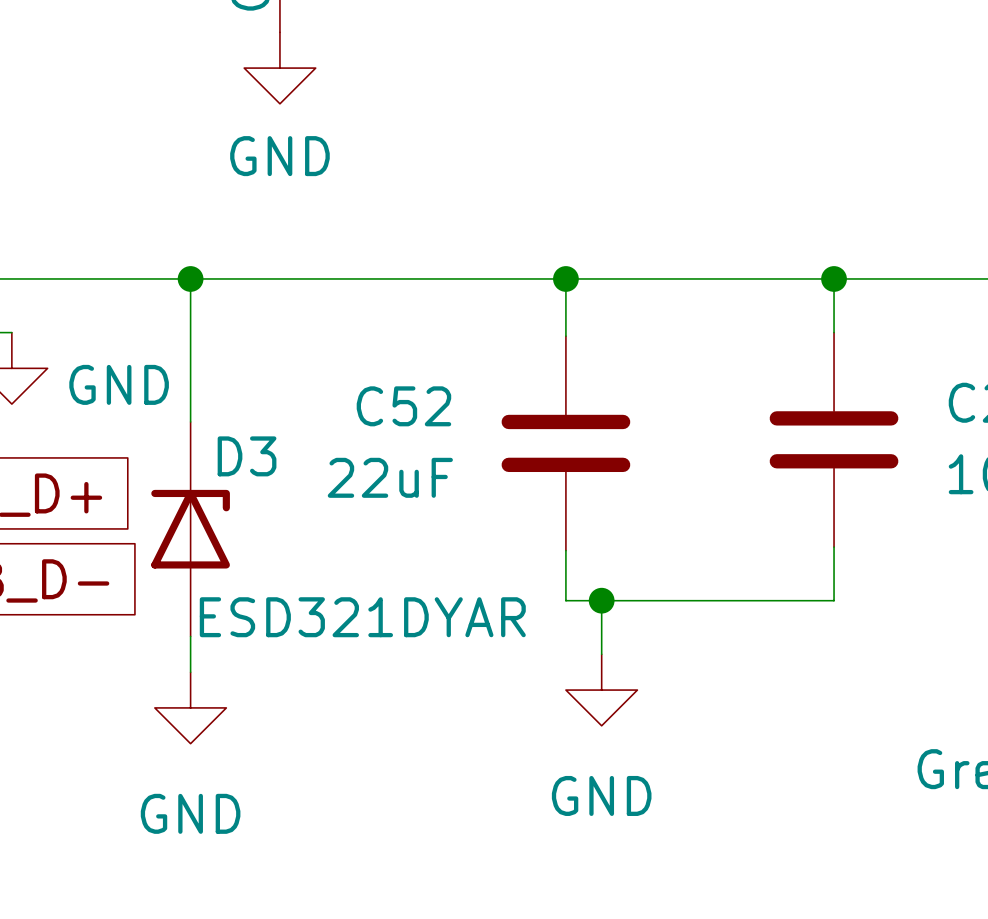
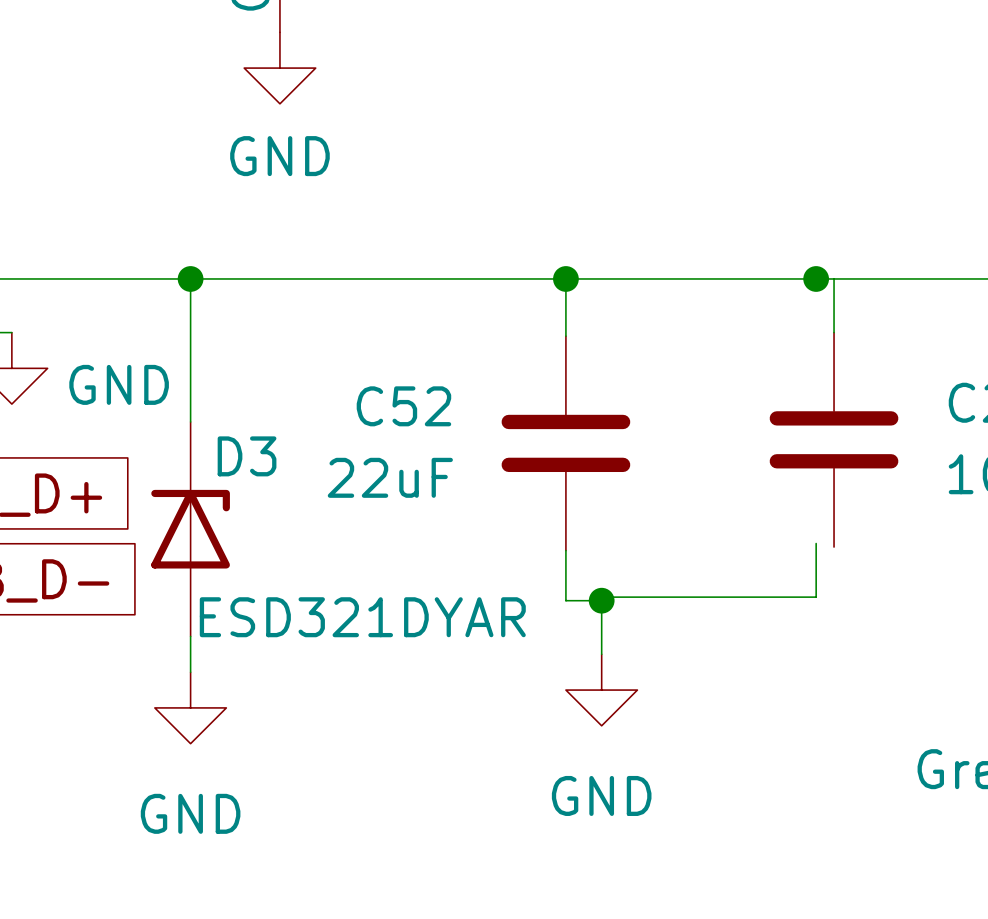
junction position: (834, 278) -> (816, 278)
wire: (834, 547) (834, 600) (601, 600) -> (816, 543) (816, 597) (601, 597) (601, 600)

